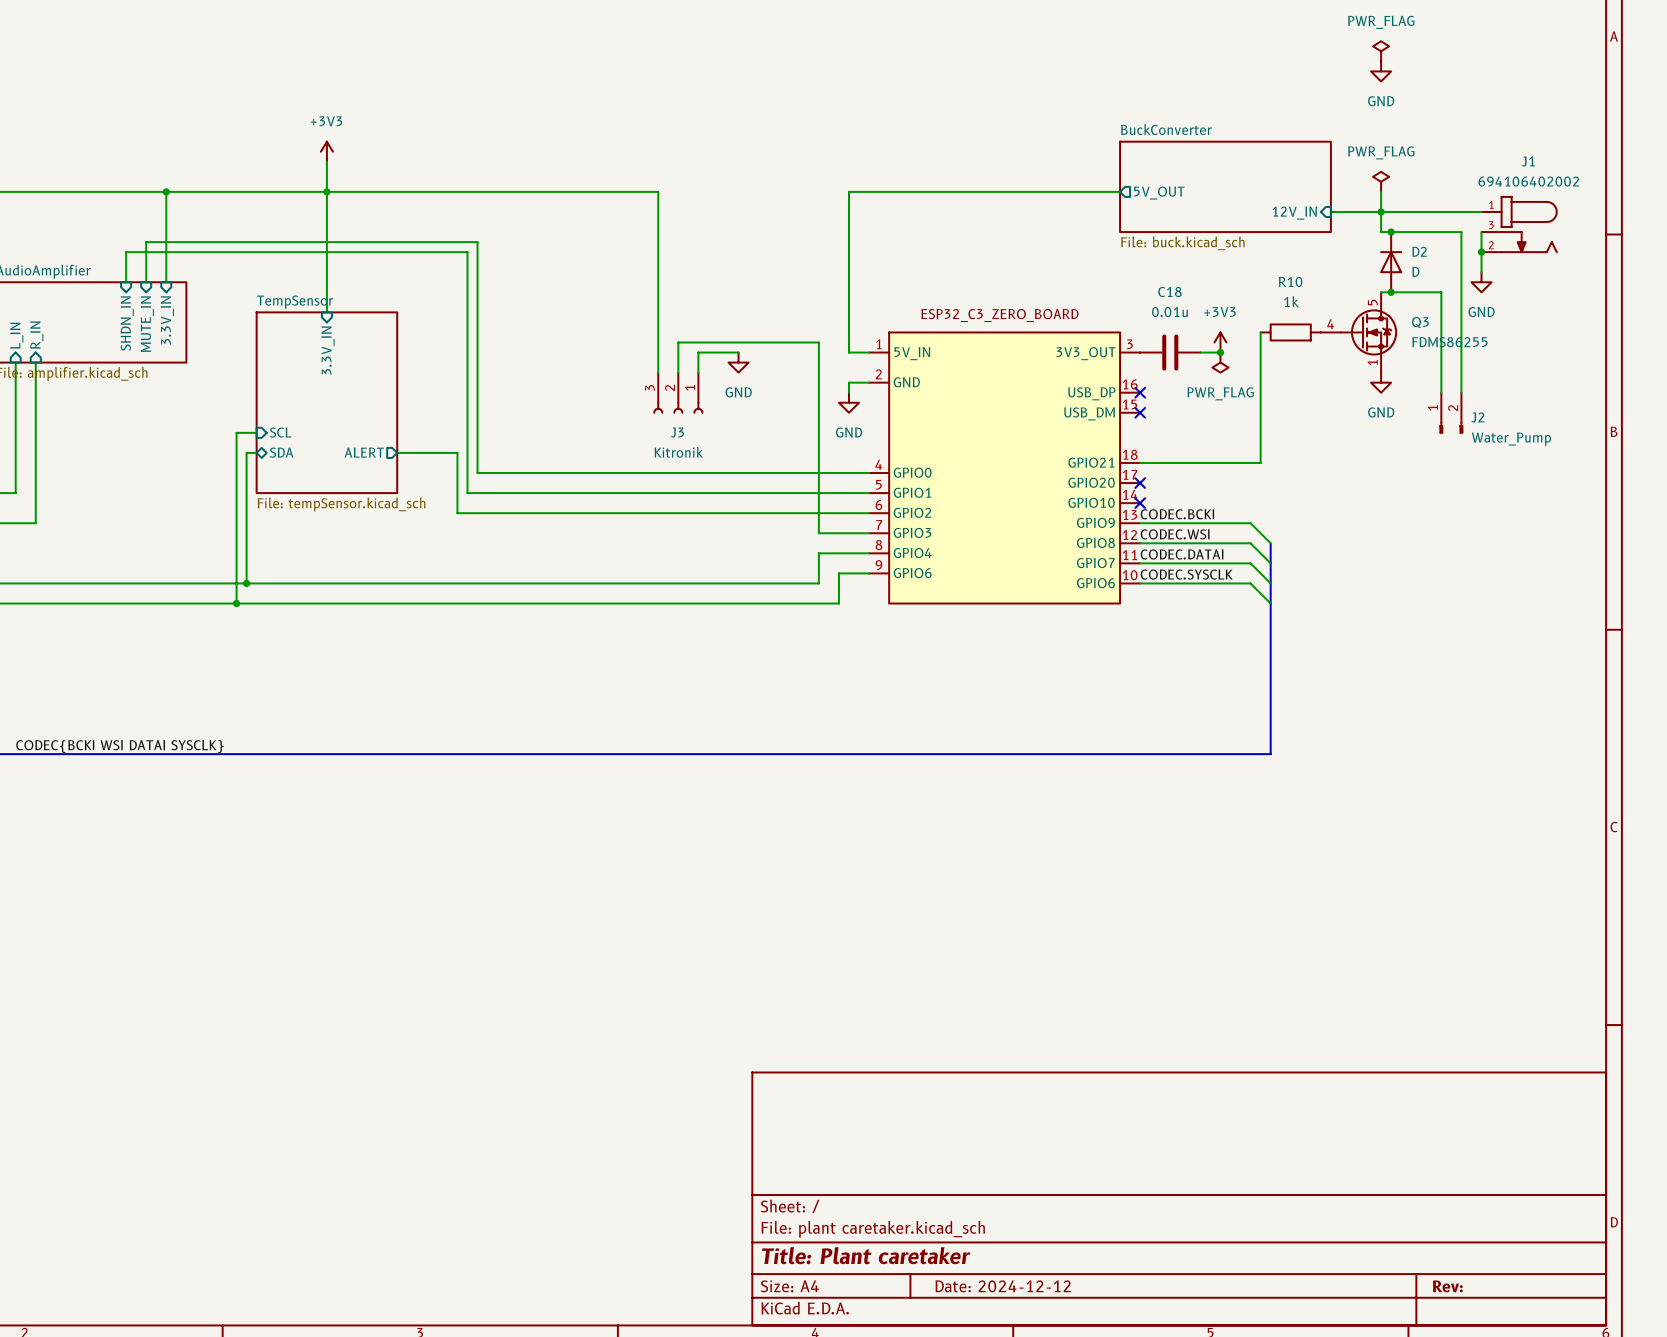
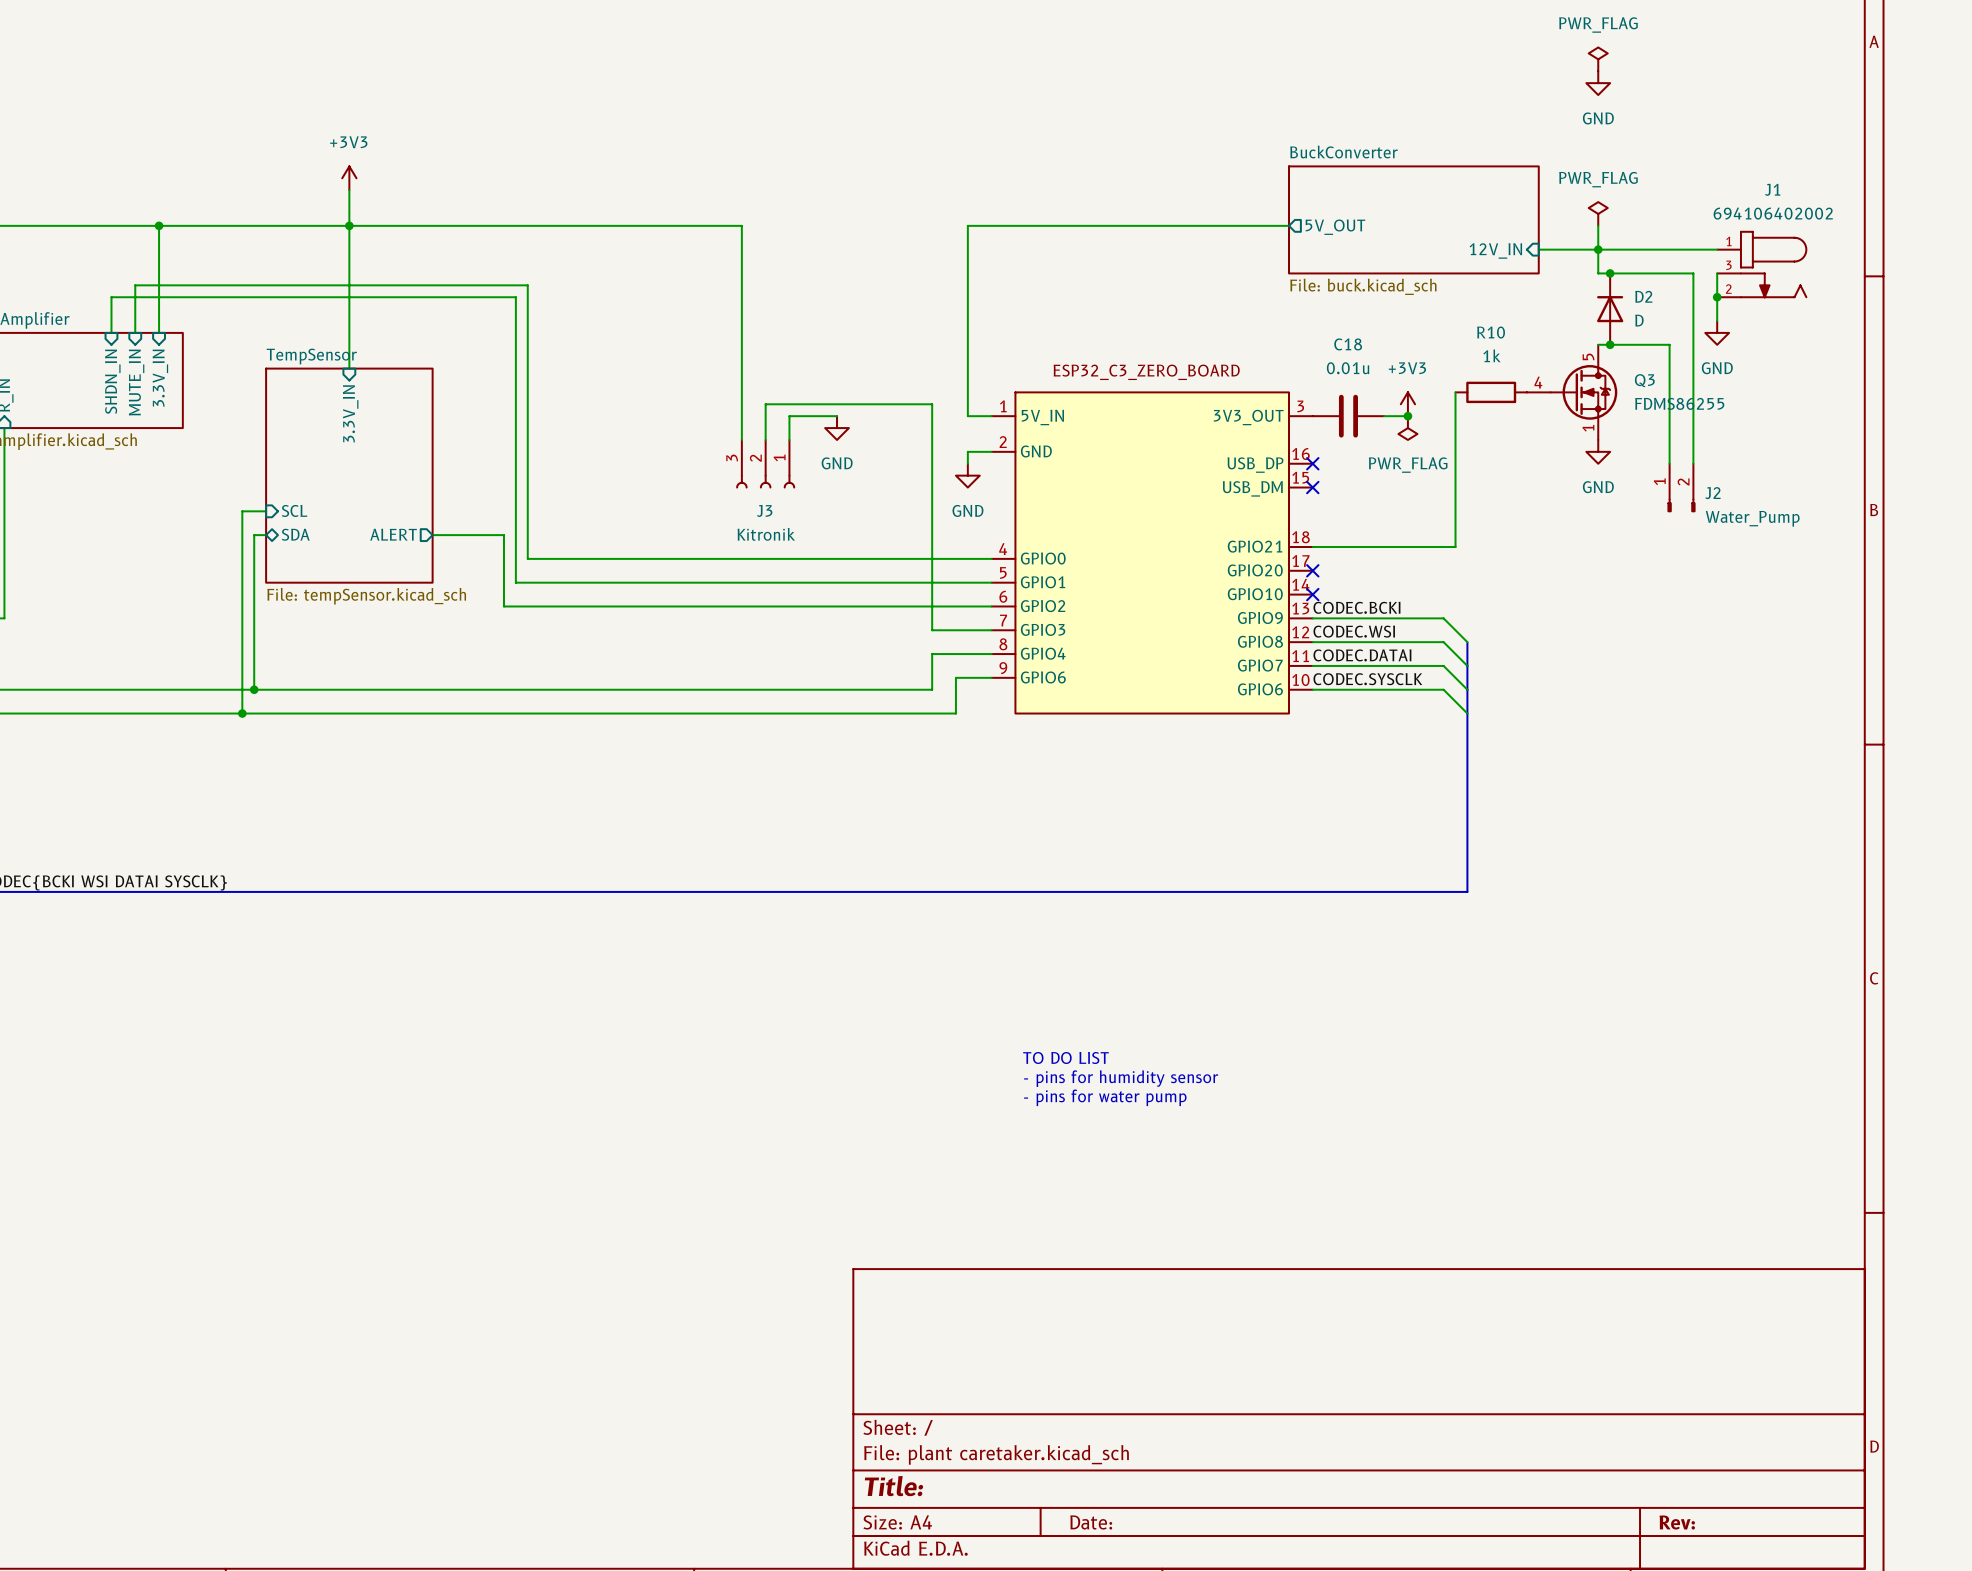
text: none -> TO DO LIST (1065, 1057)
text: none -> - pins for humidity sensor (1121, 1078)
text: none -> - pins for water pump (1105, 1097)
title block: Title: Plant caretaker (866, 1255) -> Title: (893, 1486)
title block: Date: 2024-12-12 (1003, 1286) -> Date: (1091, 1522)

